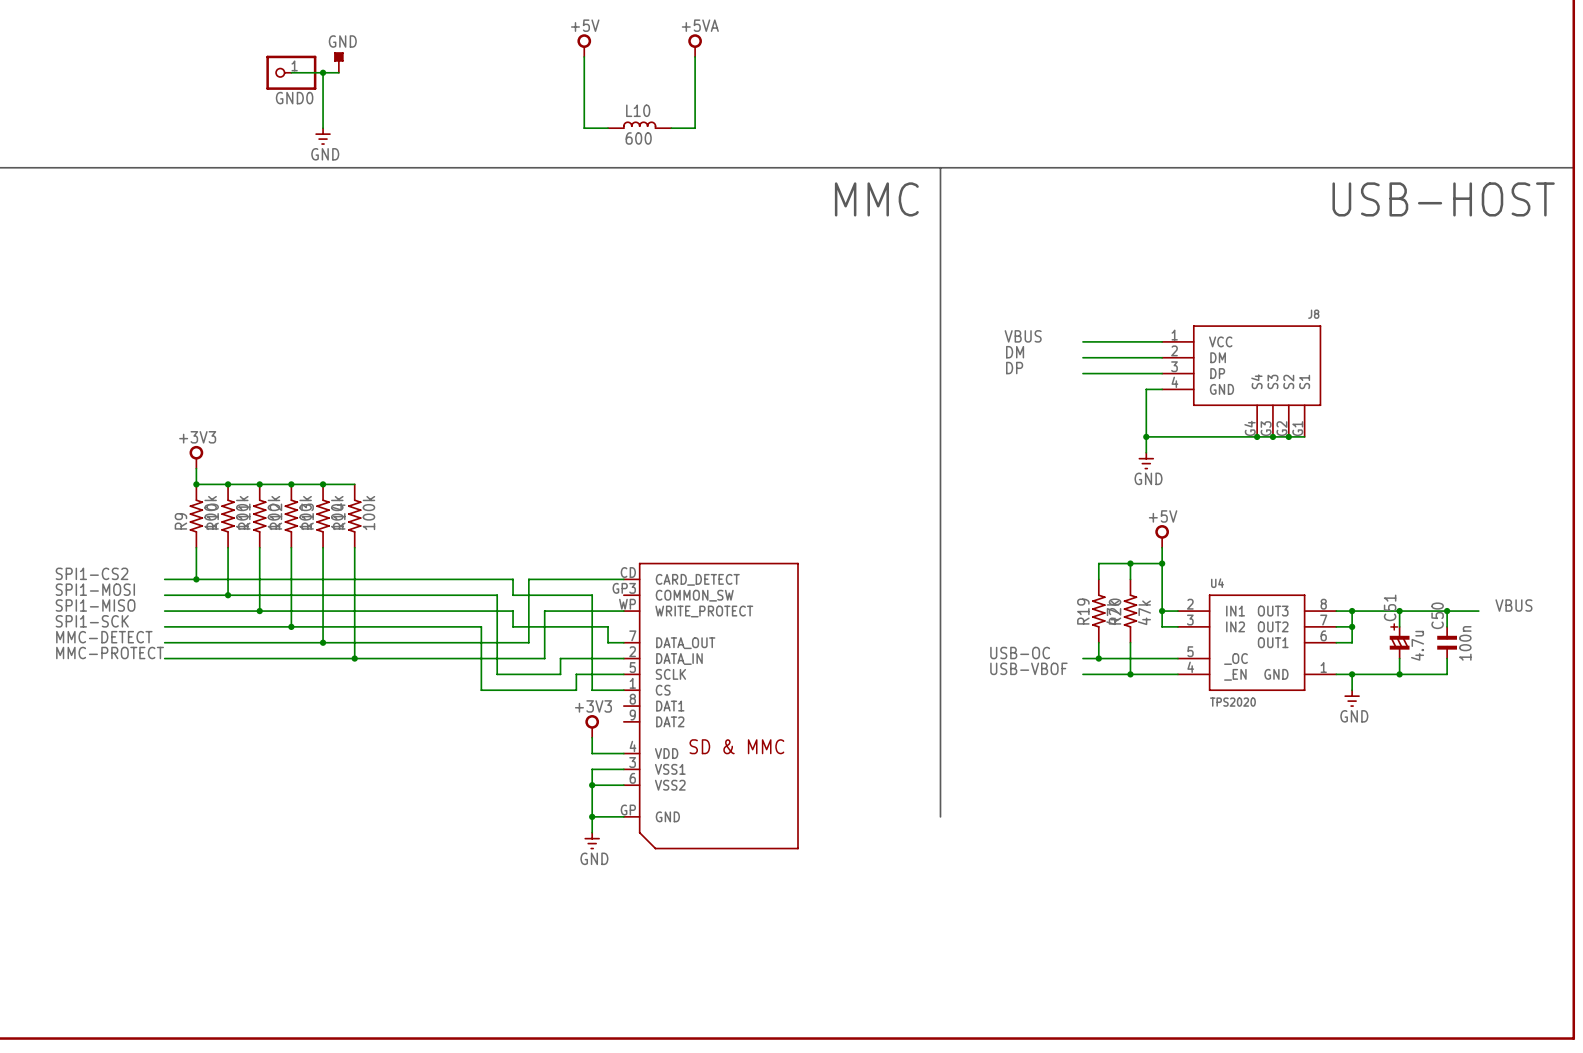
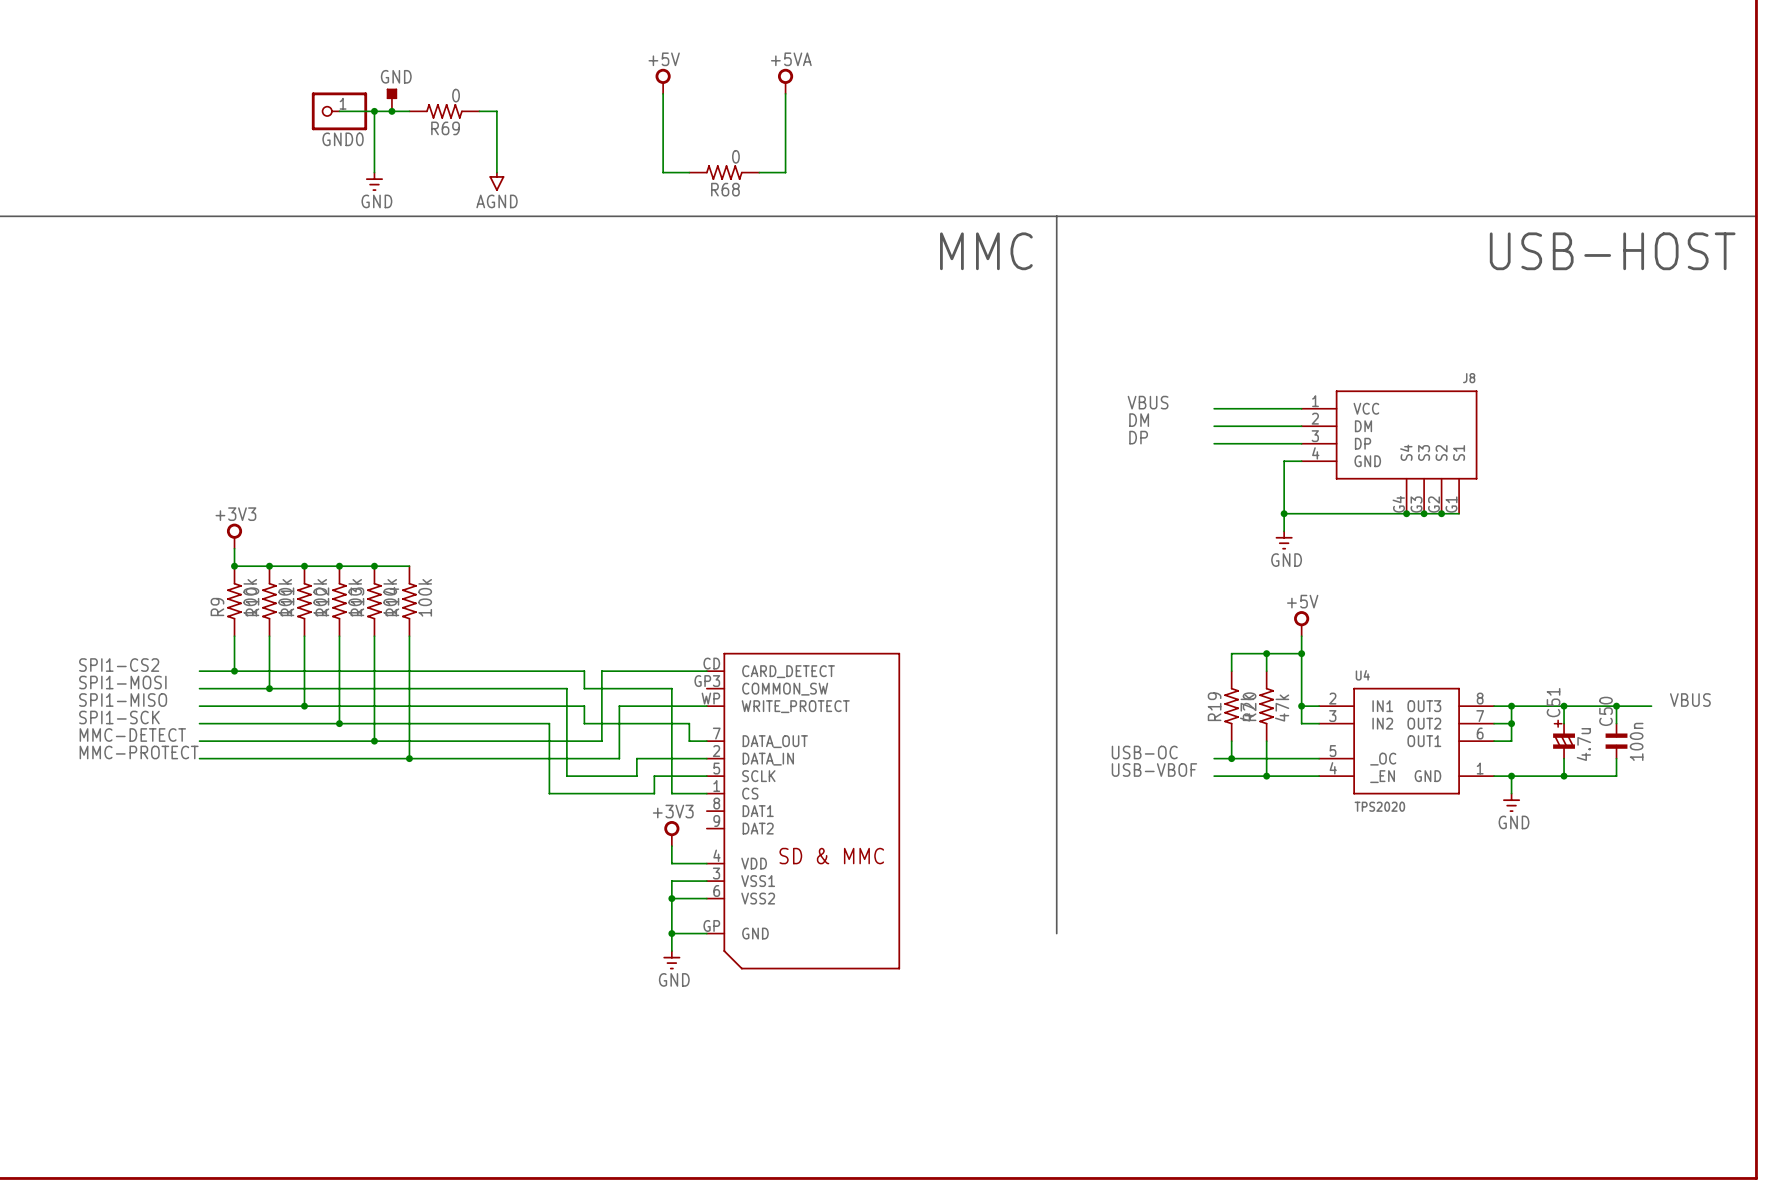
wire: none -> (391, 111) (409, 111)
junction: none -> (391, 111)
R69: none -> 0 (444, 111)
wire: none -> (479, 111) (496, 111) (496, 172)
L10: 600 (639, 125) -> none
R68: none -> 0 (724, 172)
power symbol: none -> AGND (496, 181)

